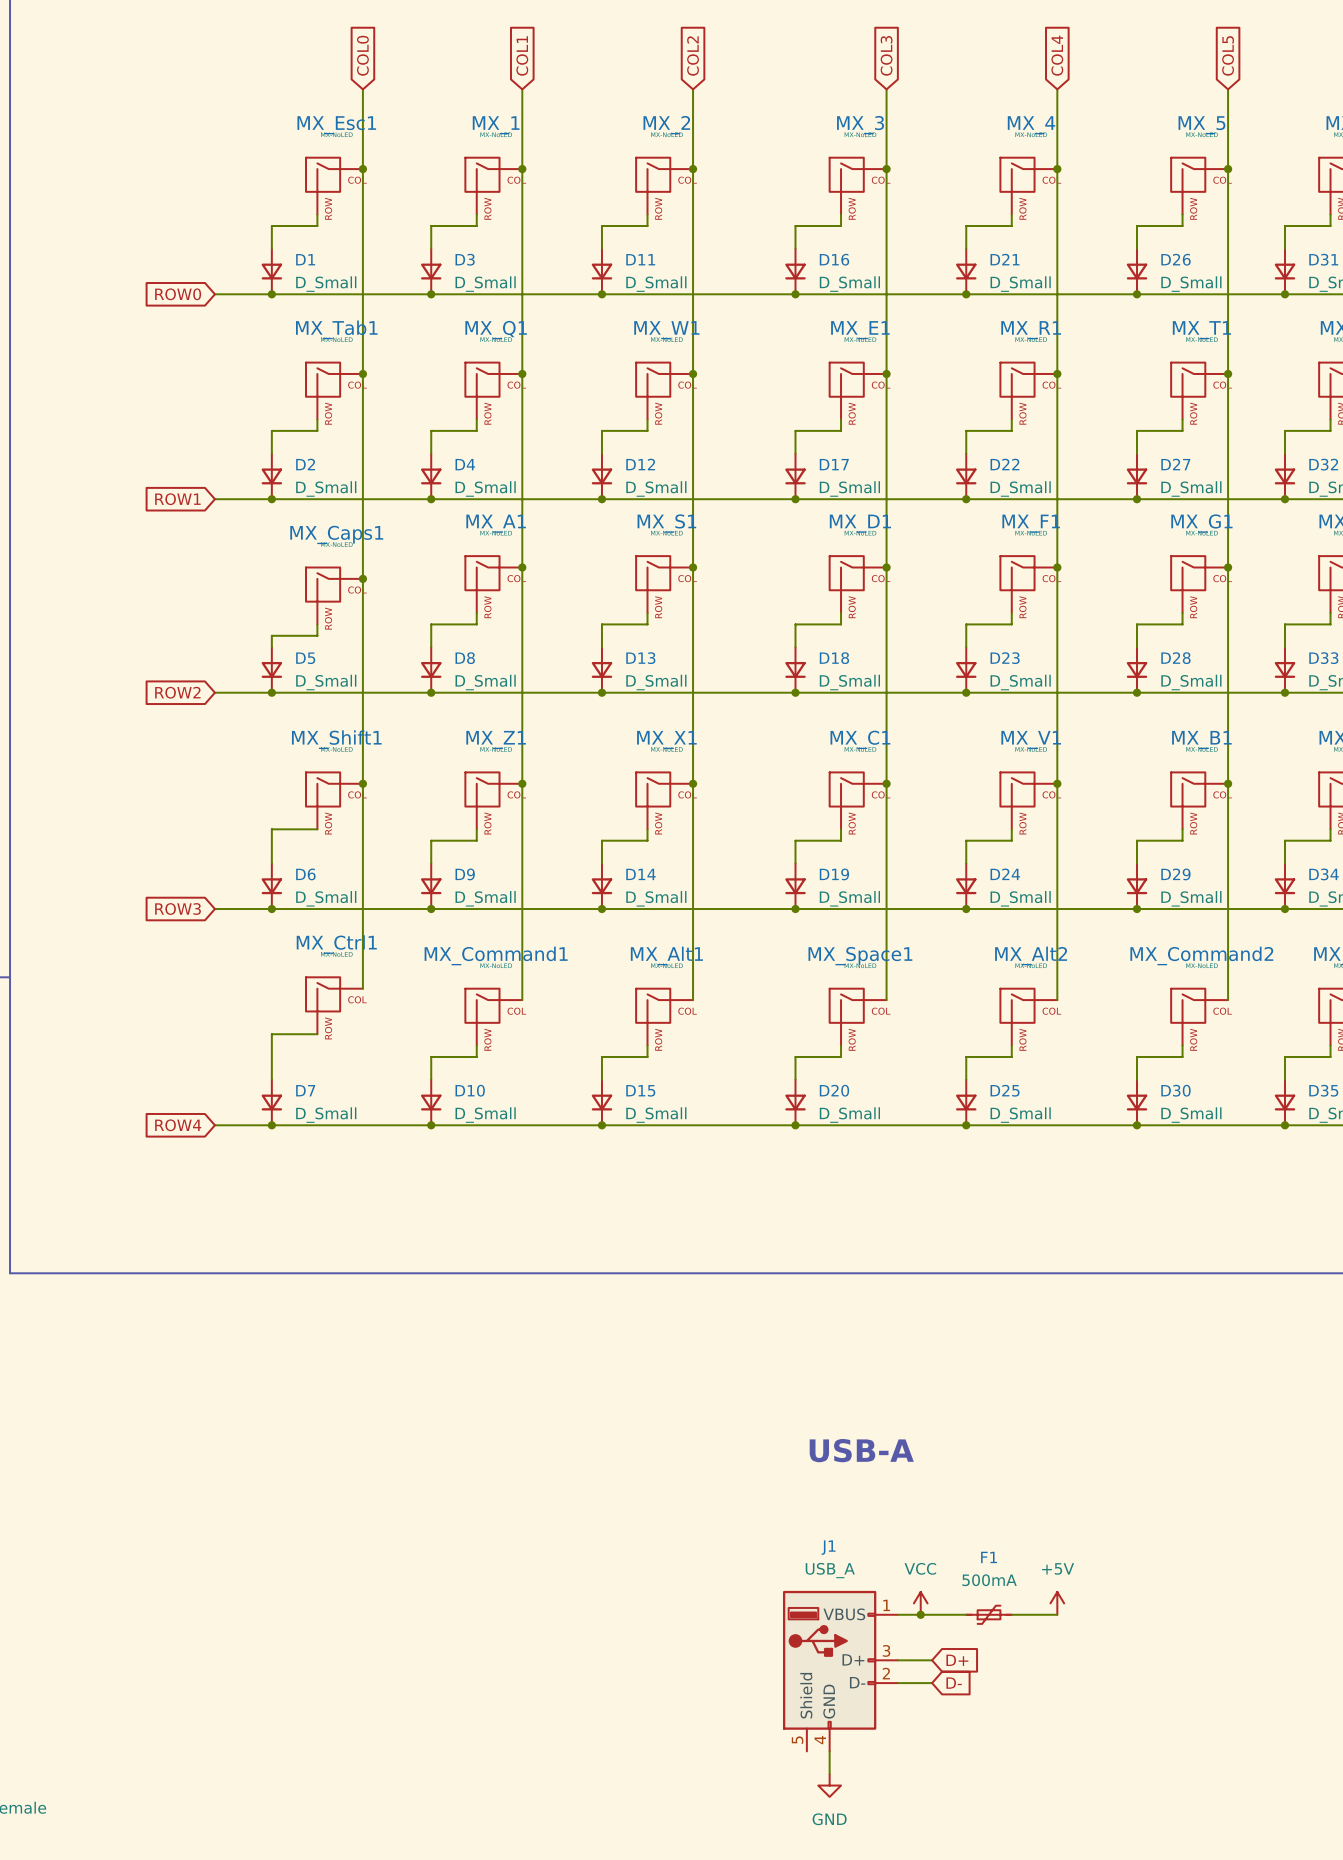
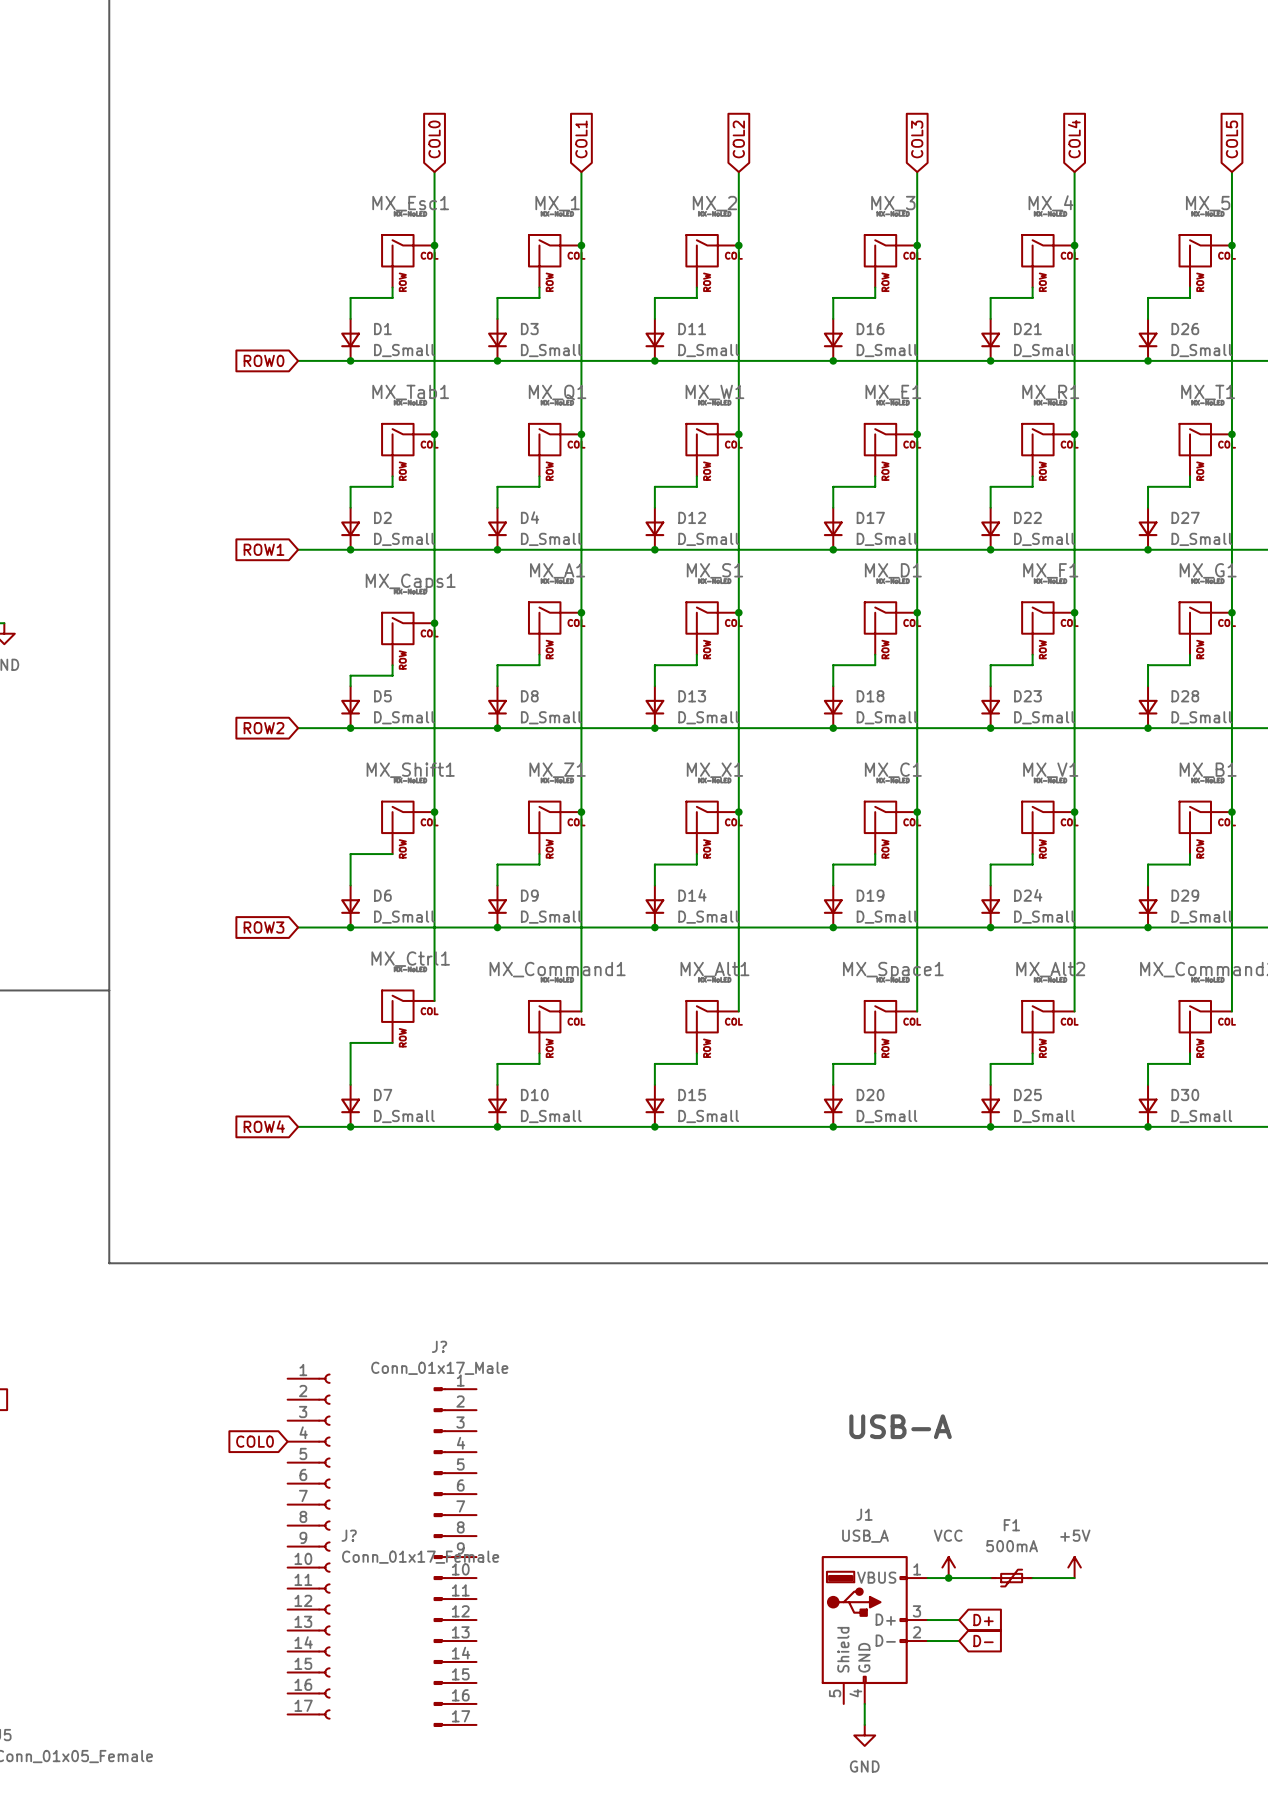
global label: none -> COL0 (255, 1441)
J?: none -> Conn_01x17_Female (308, 1546)
J?: none -> Conn_01x17_Male (455, 1557)

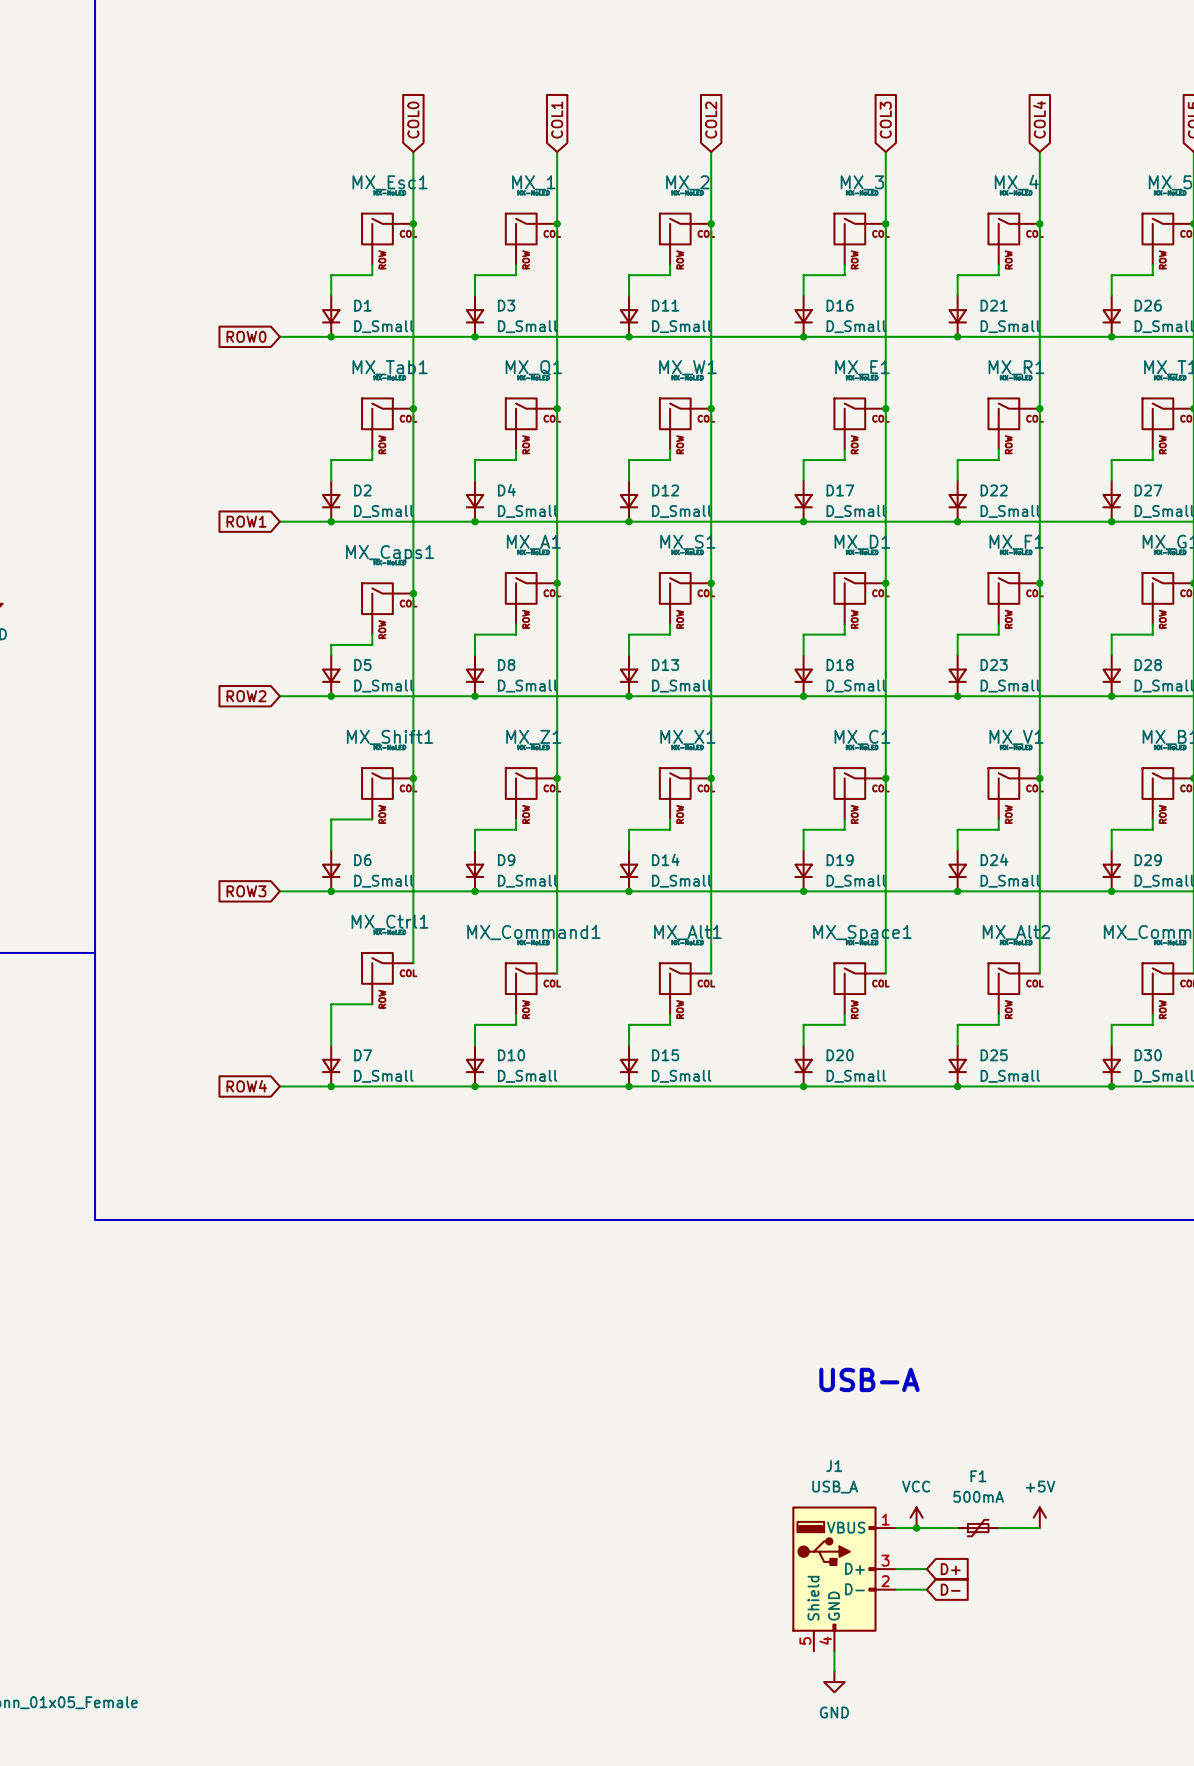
global label: COL0 (255, 1441) -> none
J?: Conn_01x17_Female (308, 1546) -> none
J?: Conn_01x17_Male (455, 1557) -> none

